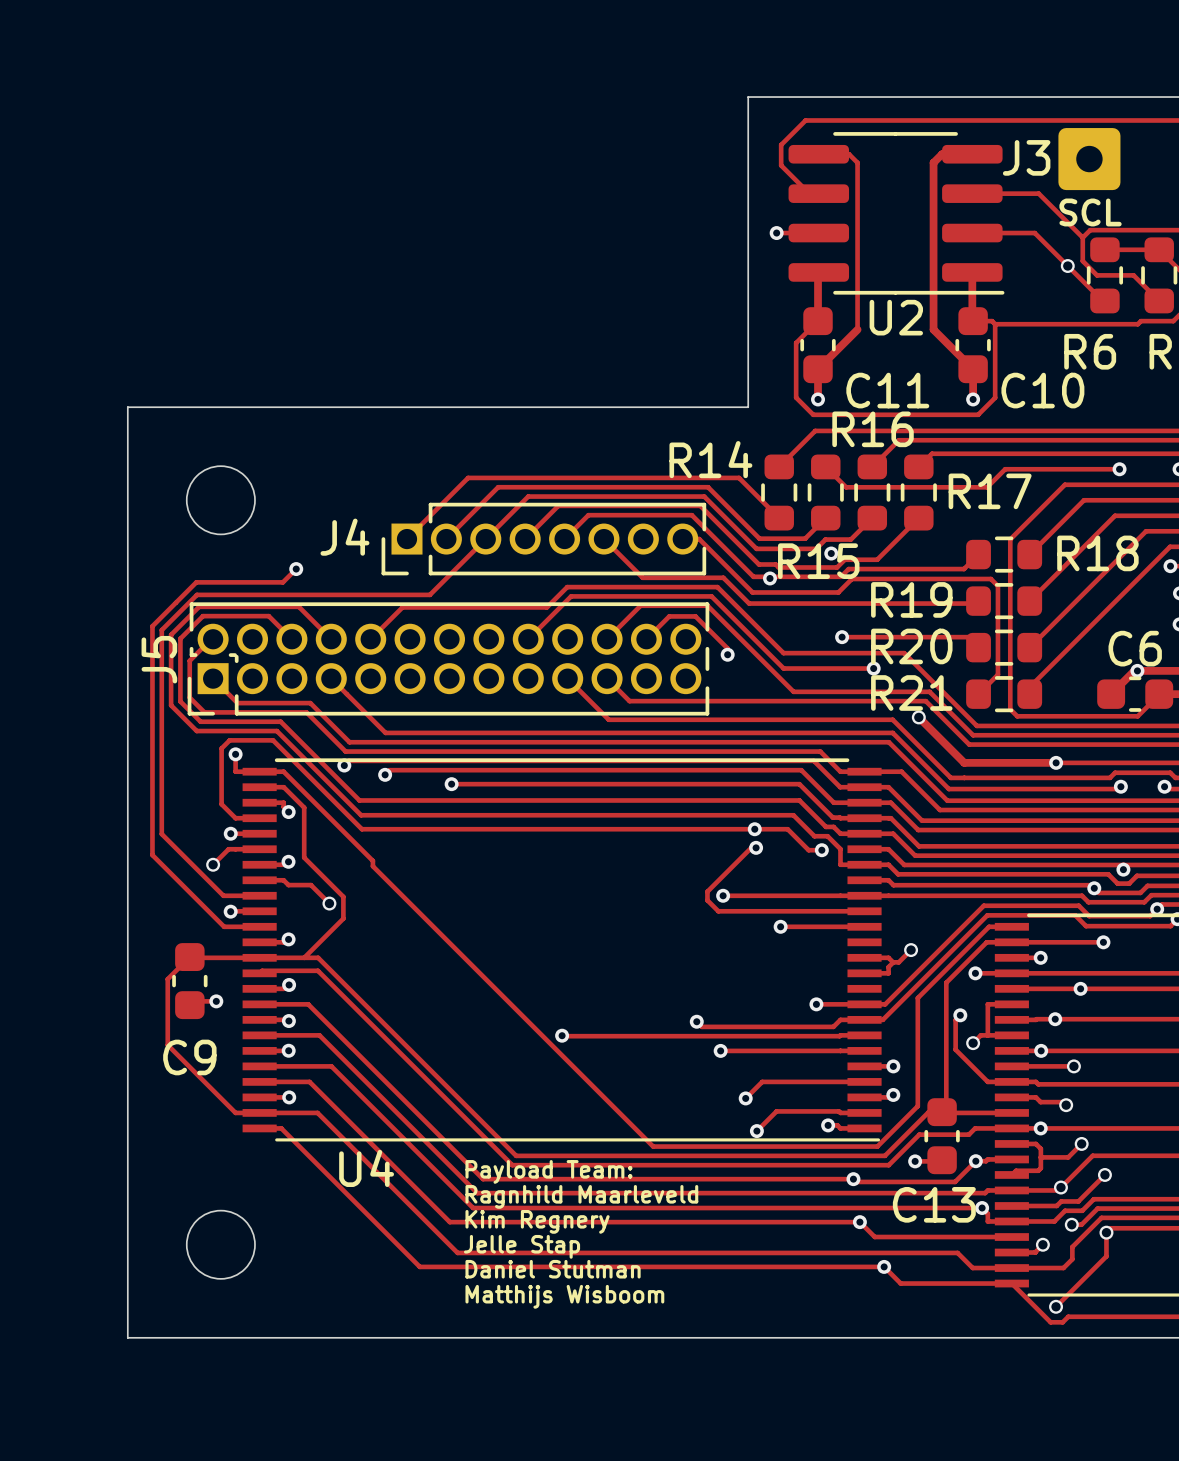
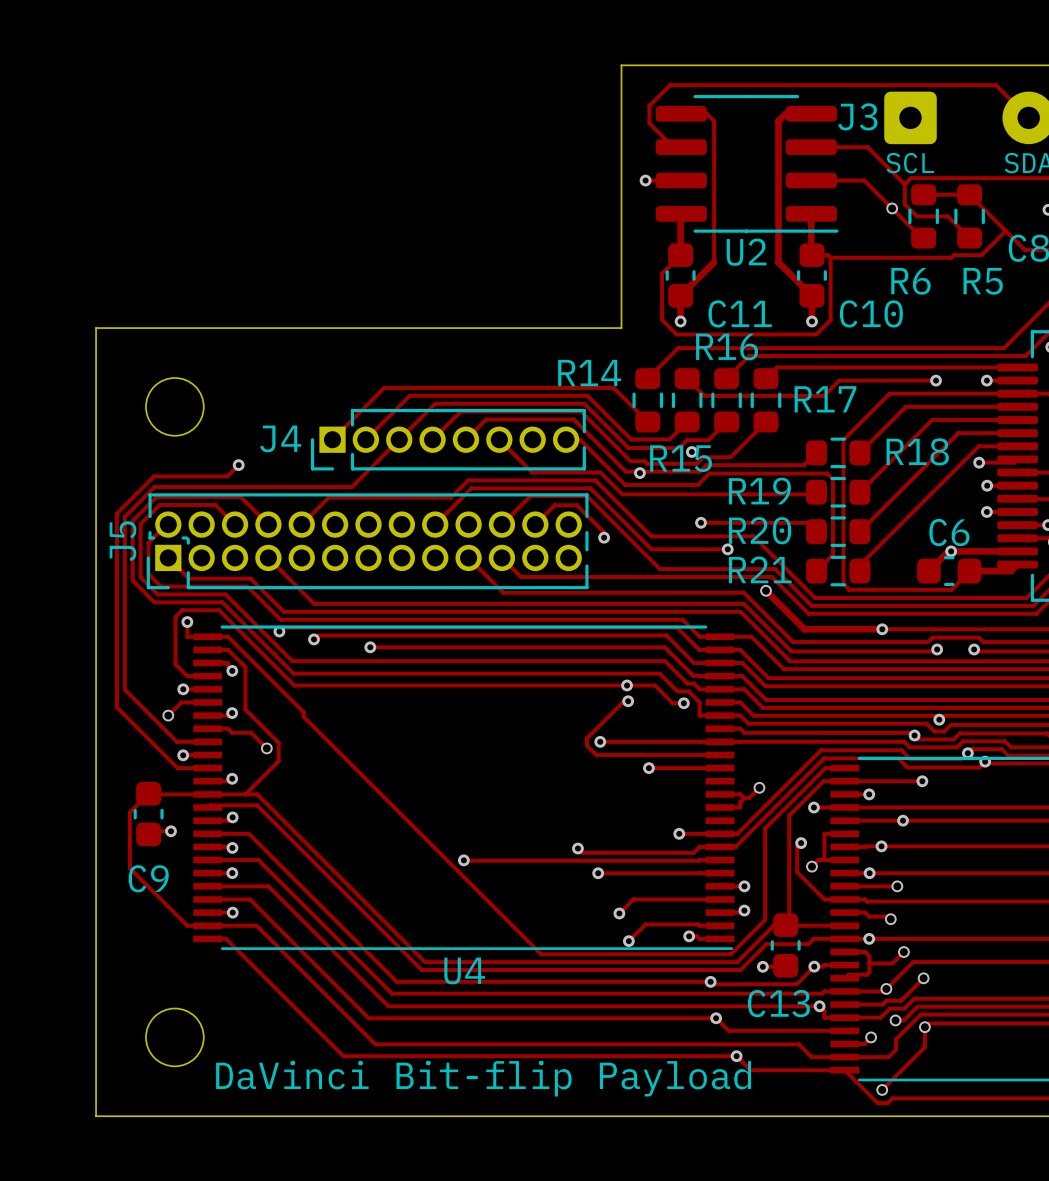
U4 name position: U4 (366, 1168) -> U4 (464, 970)
text: Payload Team: (548, 1171) -> none
text: Ragnhild Maarleveld (581, 1196) -> none
text: Kim Regnery (537, 1221) -> none
text: Jelle Stap (522, 1246) -> none
text: Daniel Stutman (553, 1269) -> none
text: none -> DaVinci Bit-flip Payload (483, 1078)
text: Matthijs Wisboom (564, 1296) -> none

